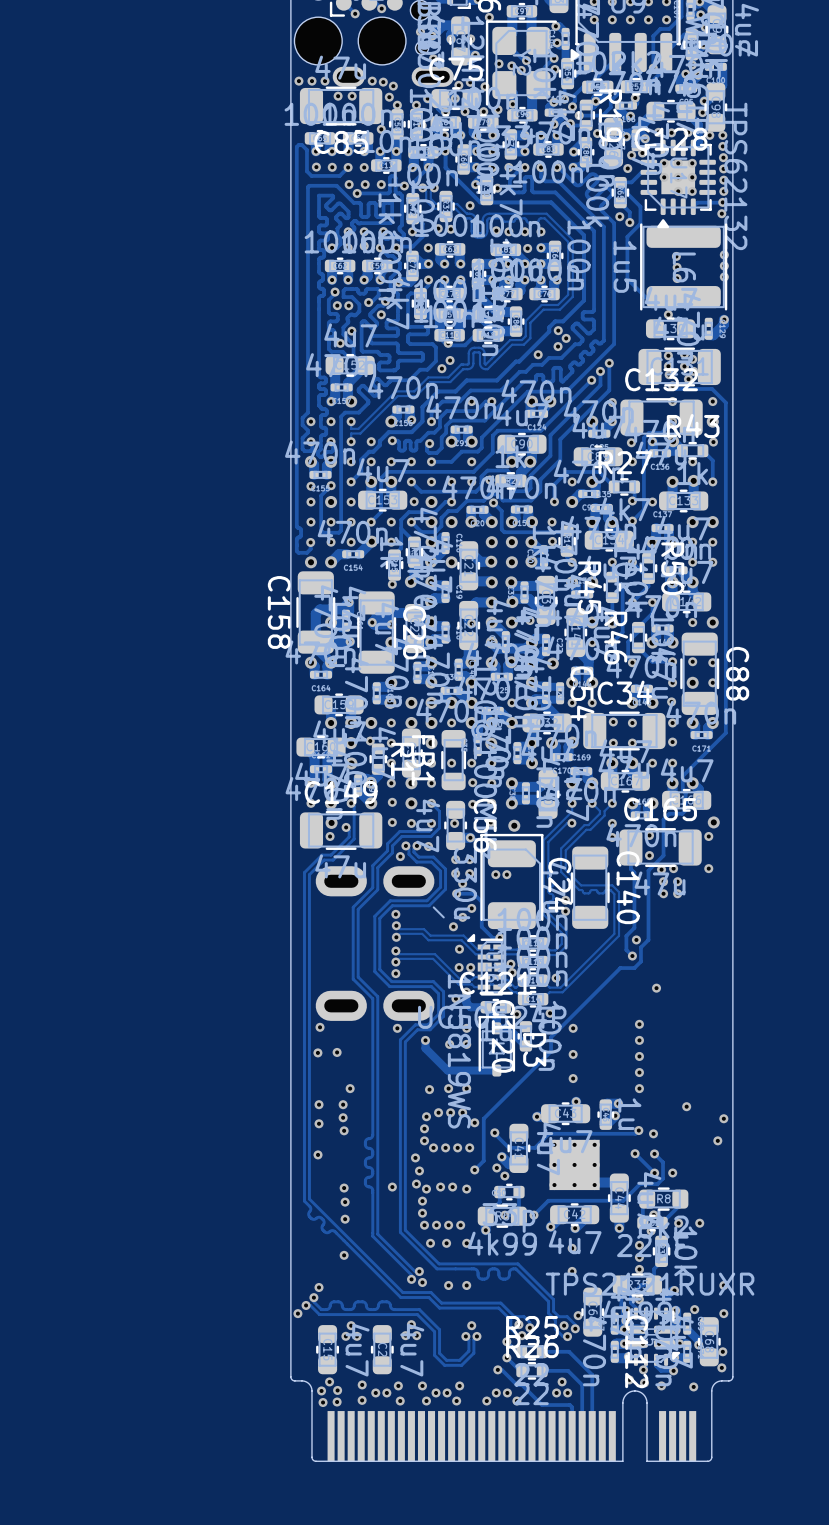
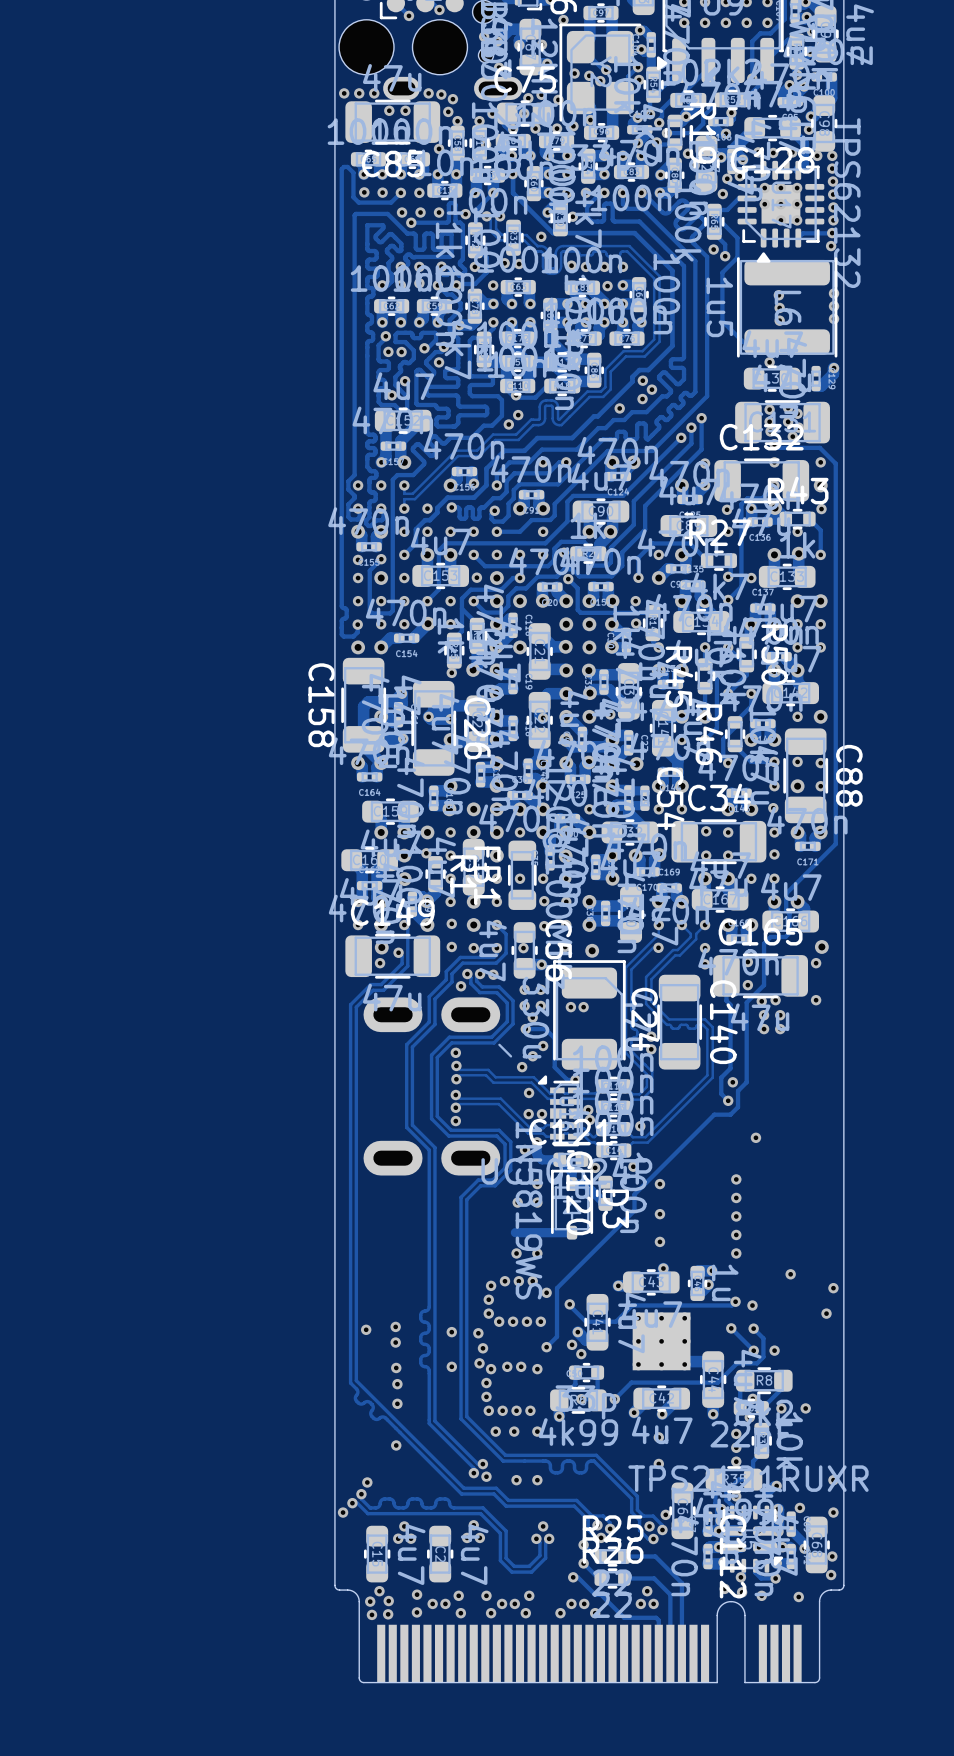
via: (320, 1027) -> none
via: (397, 1028) -> none
track: (425, 1040) (425, 1048) (447, 1070) -> none
via: (425, 1040) -> none
via: (317, 1052) -> none
via: (337, 1052) -> none
via: (350, 1088) -> none
via: (429, 1089) -> none
via: (319, 1104) -> none
via: (343, 1104) -> none
via: (343, 1117) -> none
via: (319, 1123) -> none
via: (344, 1130) -> none
via: none -> (395, 1326)
via: none -> (451, 1332)
via: none -> (395, 1342)

